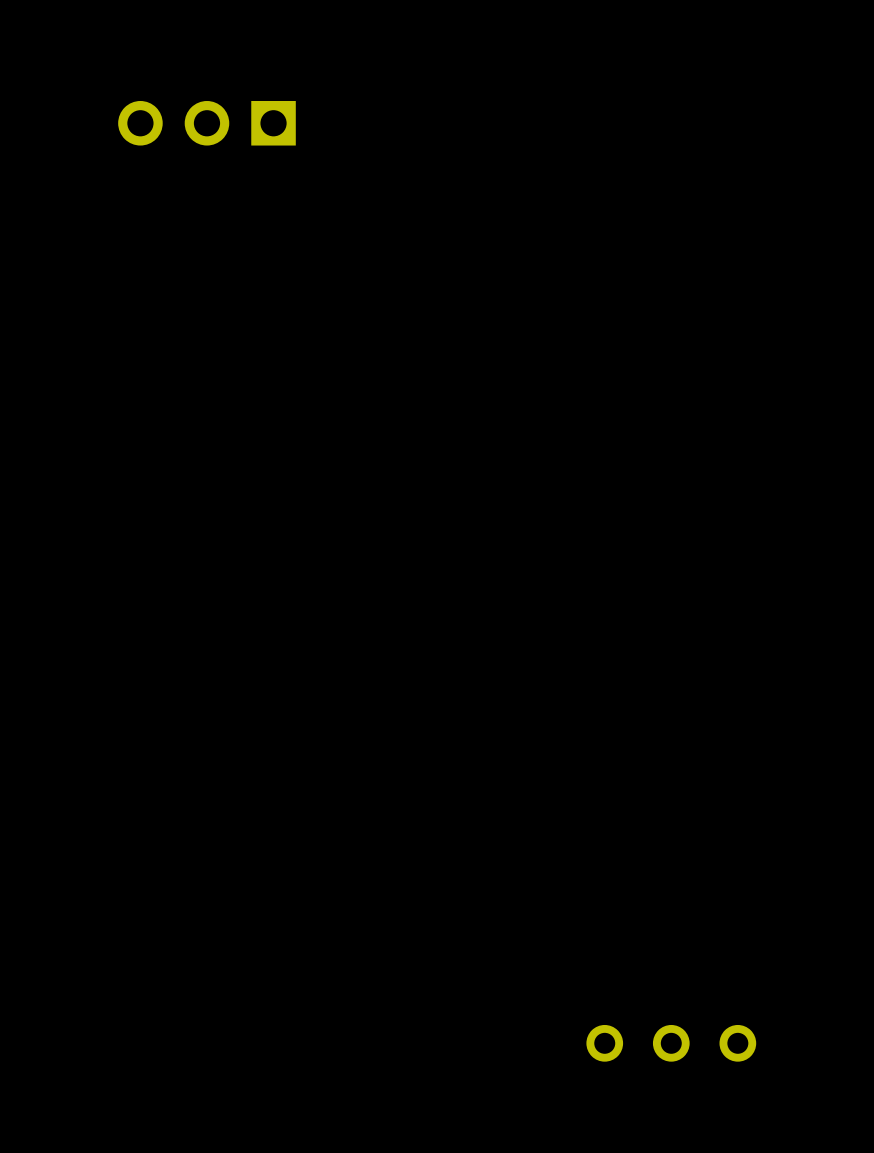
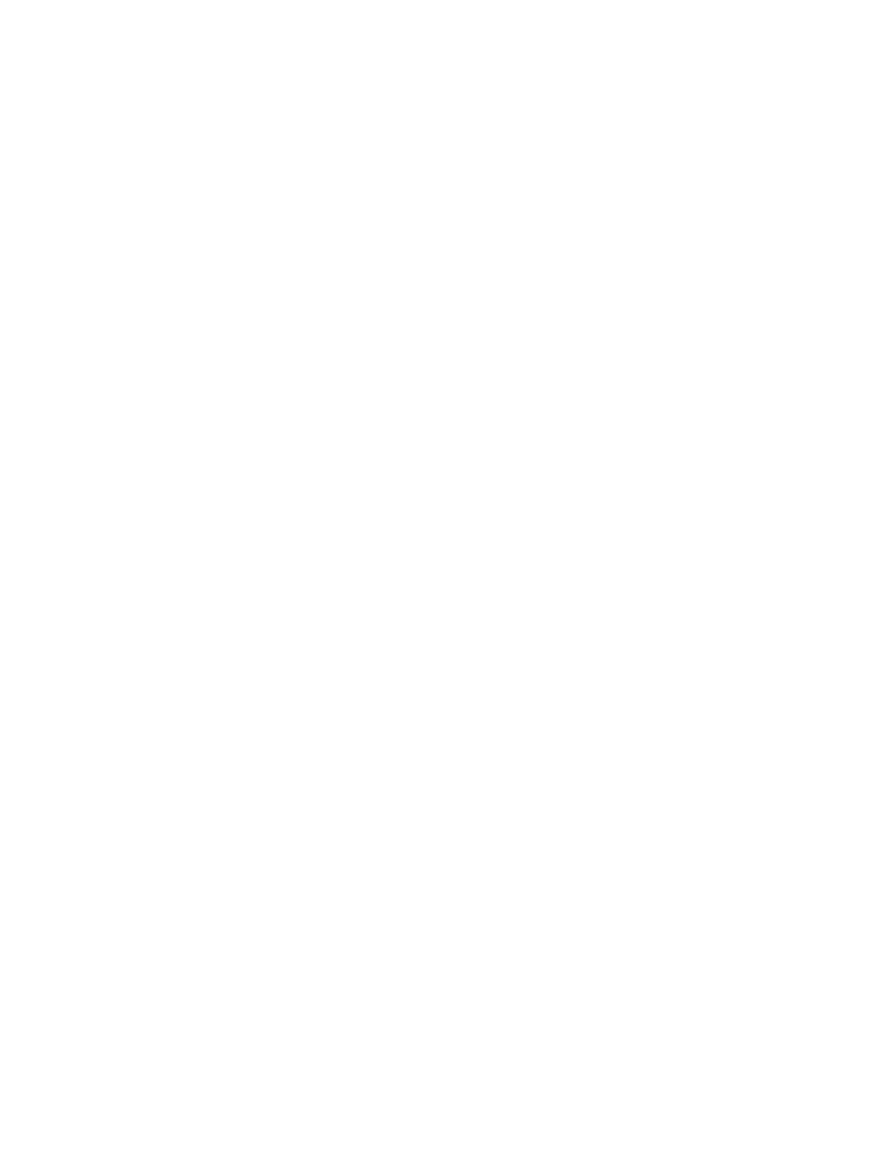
part: (206, 123) -> none
part: (671, 1043) -> none

